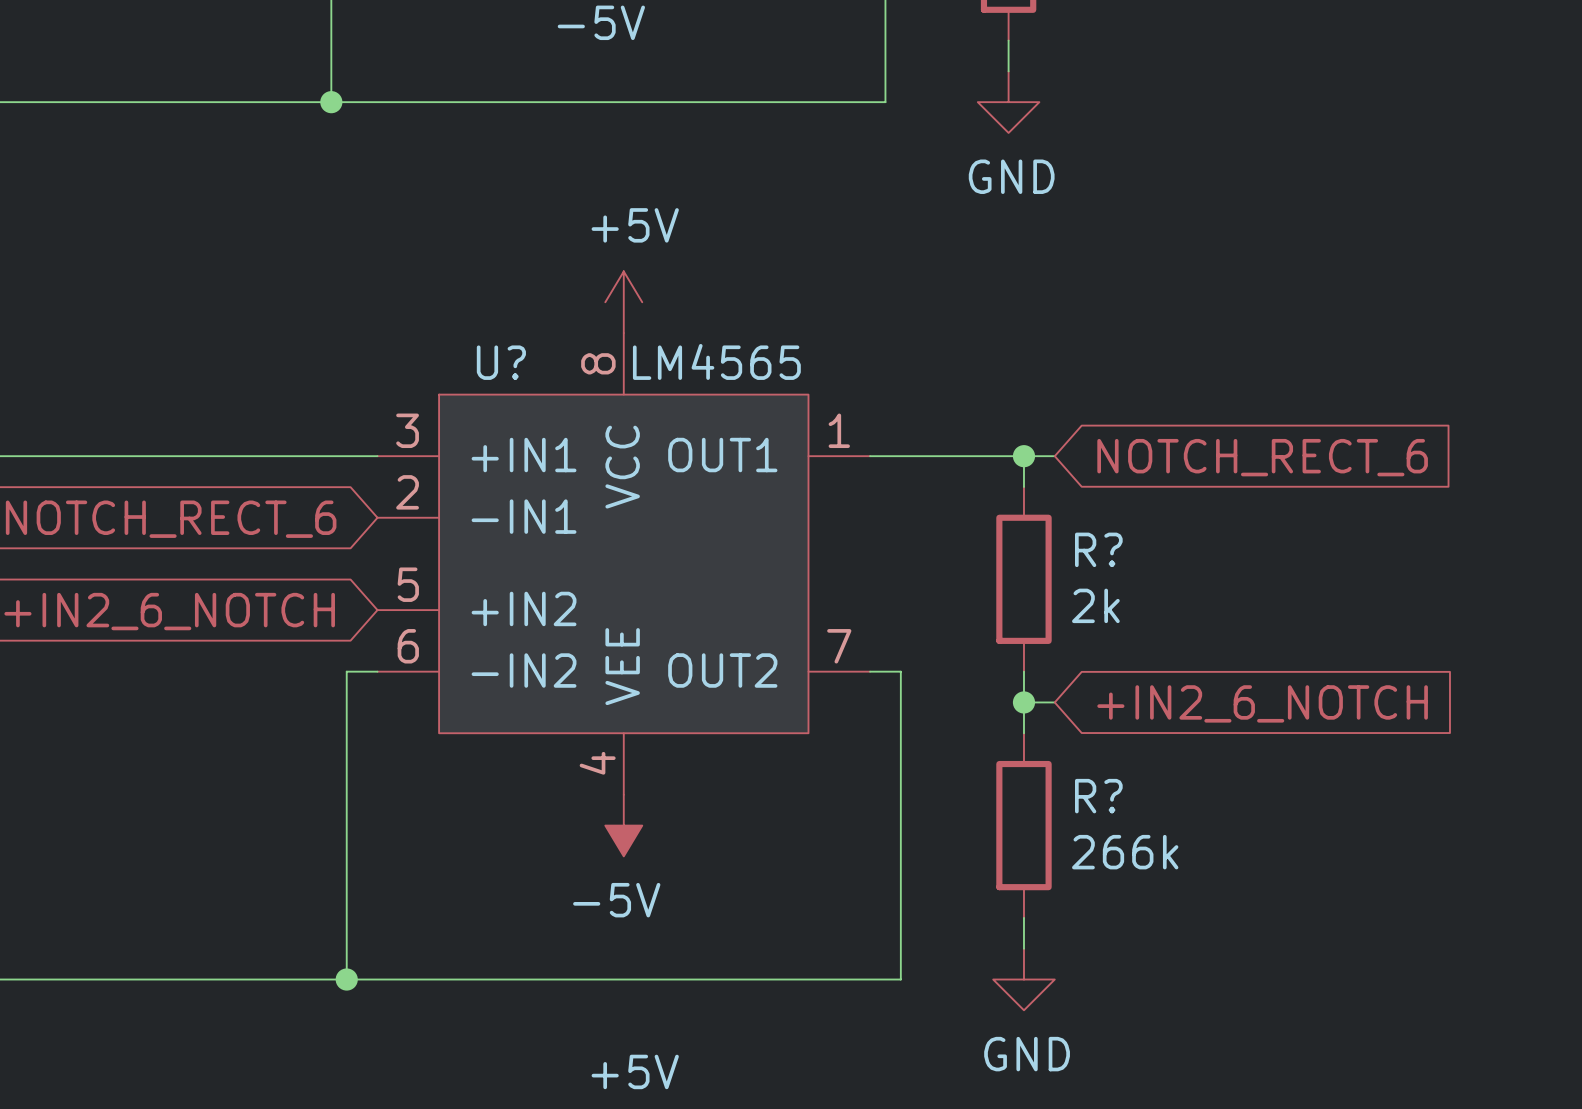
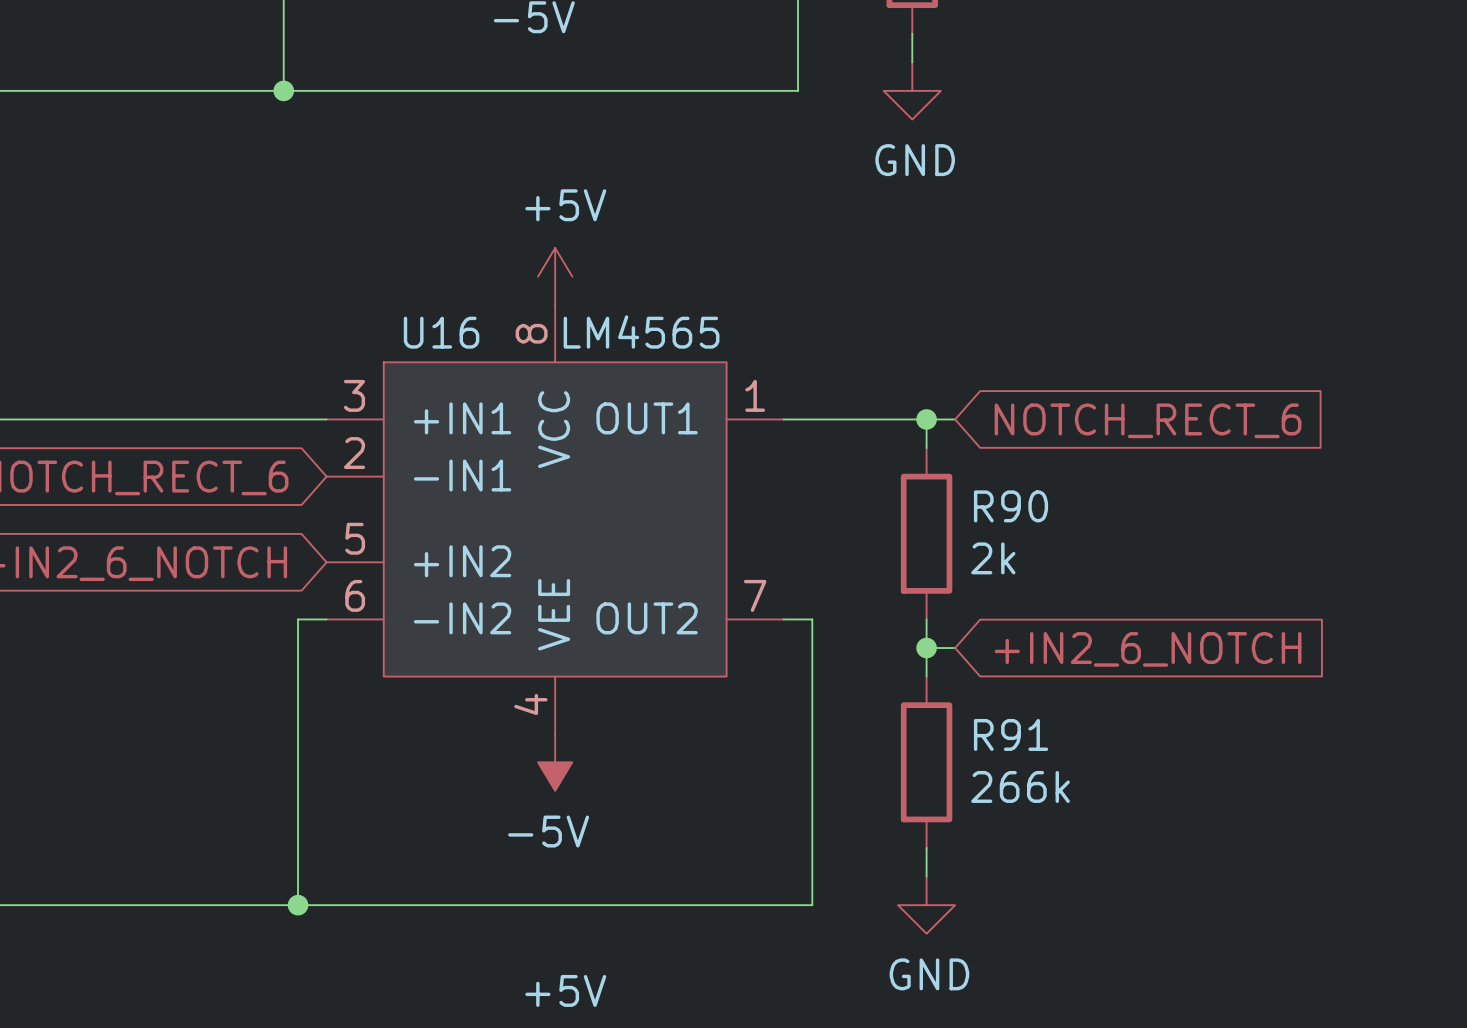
U? name: U? (501, 362) -> U16 (441, 332)
R? name: R? (1098, 549) -> R90 (1011, 506)
R? name: R? (1098, 796) -> R91 (1011, 734)

